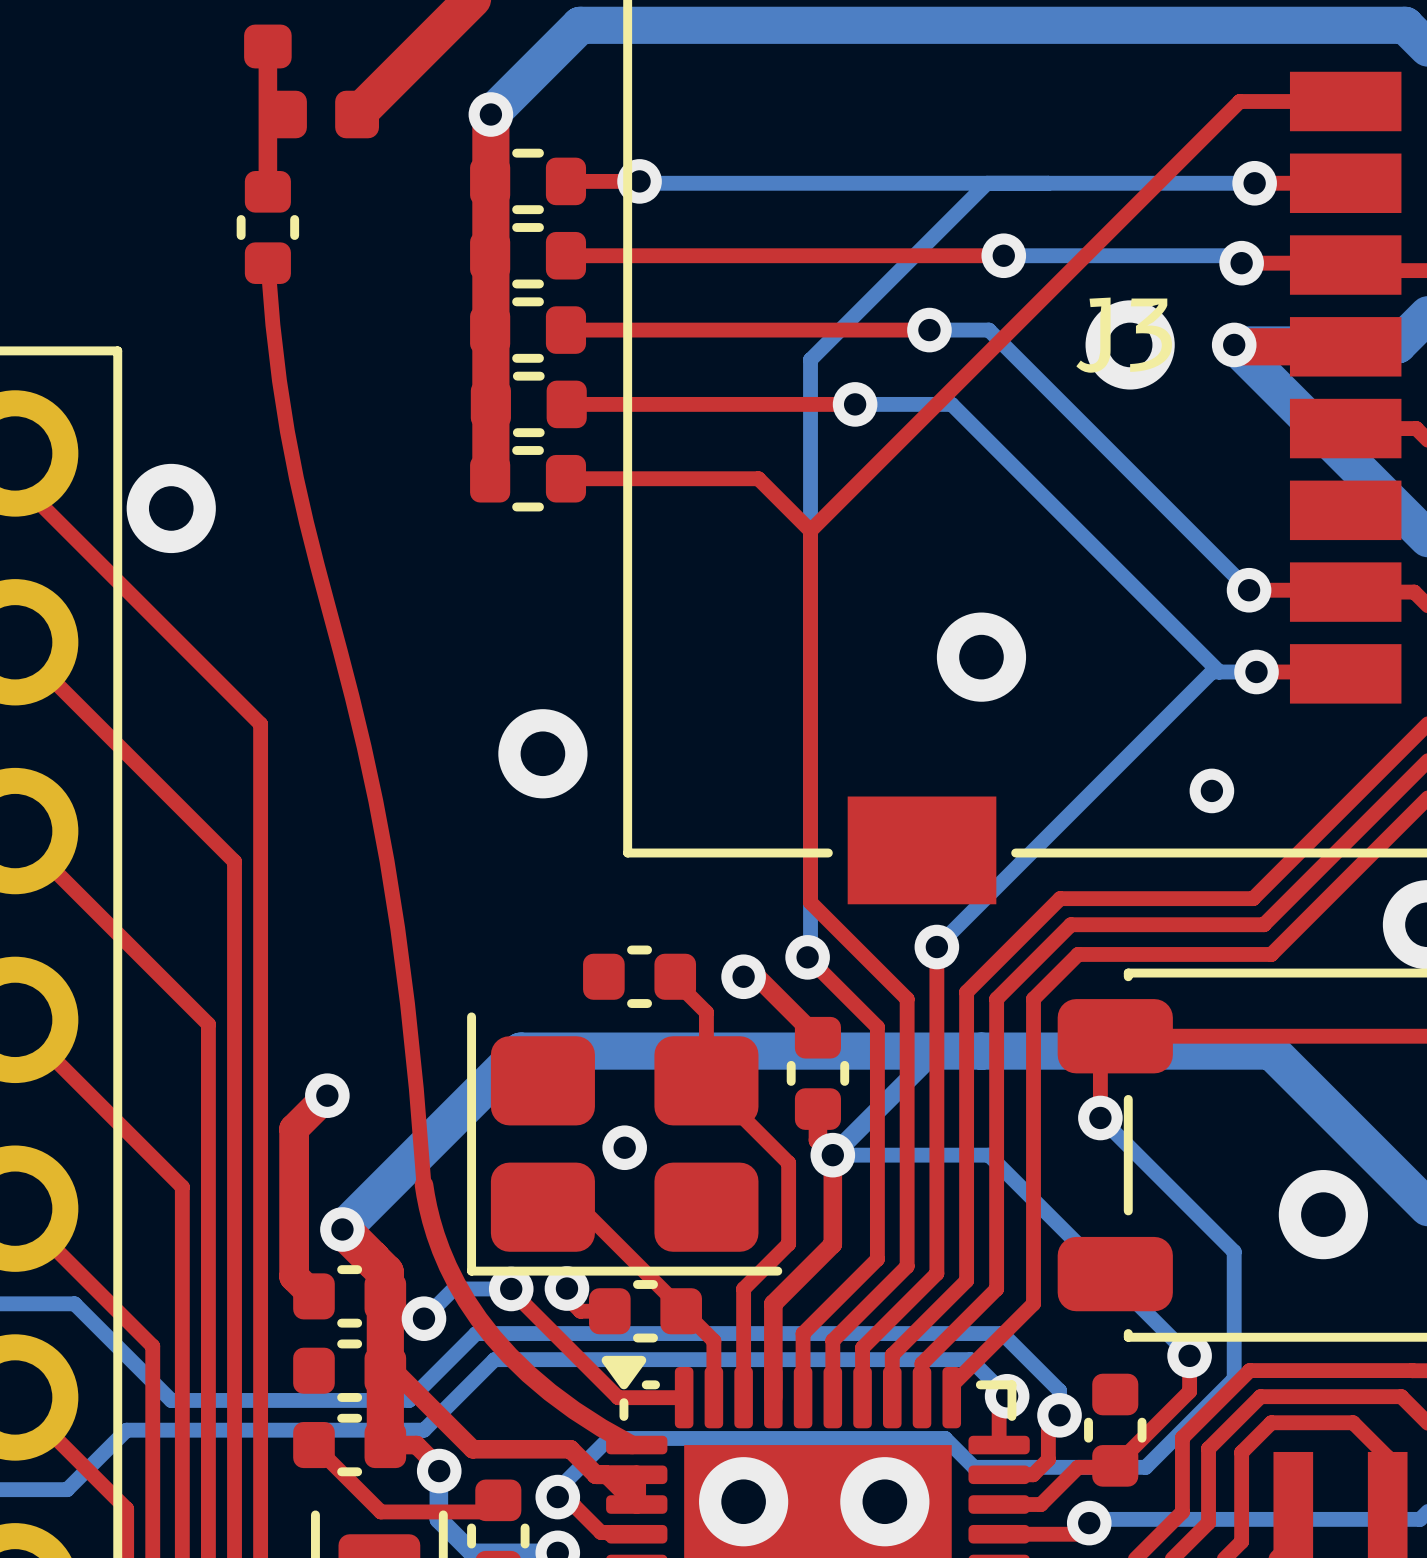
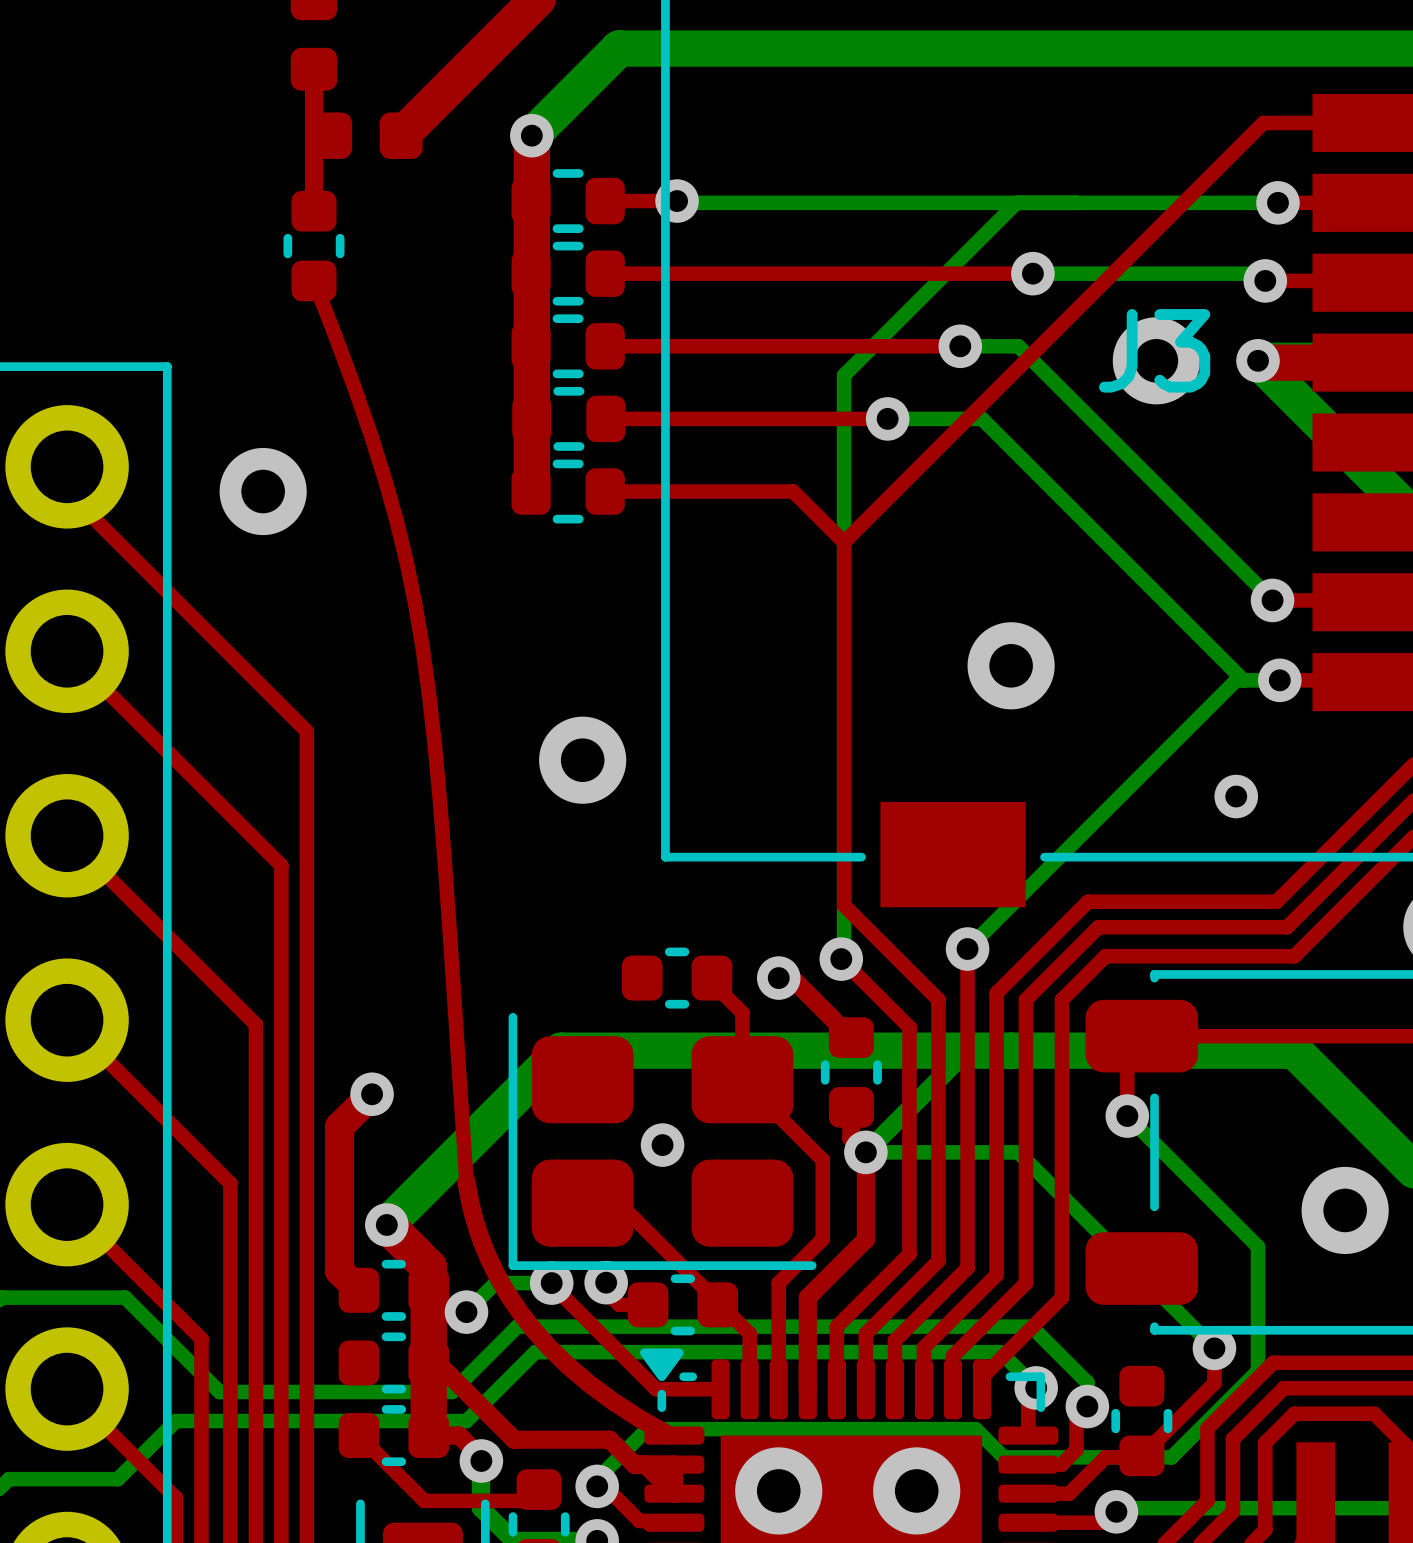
top track: (267, 263) (279, 380) (296, 478) (364, 746) (387, 861) (407, 1003) (423, 1184) -> (313, 280) (354, 387) (384, 478) (406, 563) (415, 605) (429, 695) (439, 800) (466, 1181)
via position: (171, 508) -> (263, 491)

